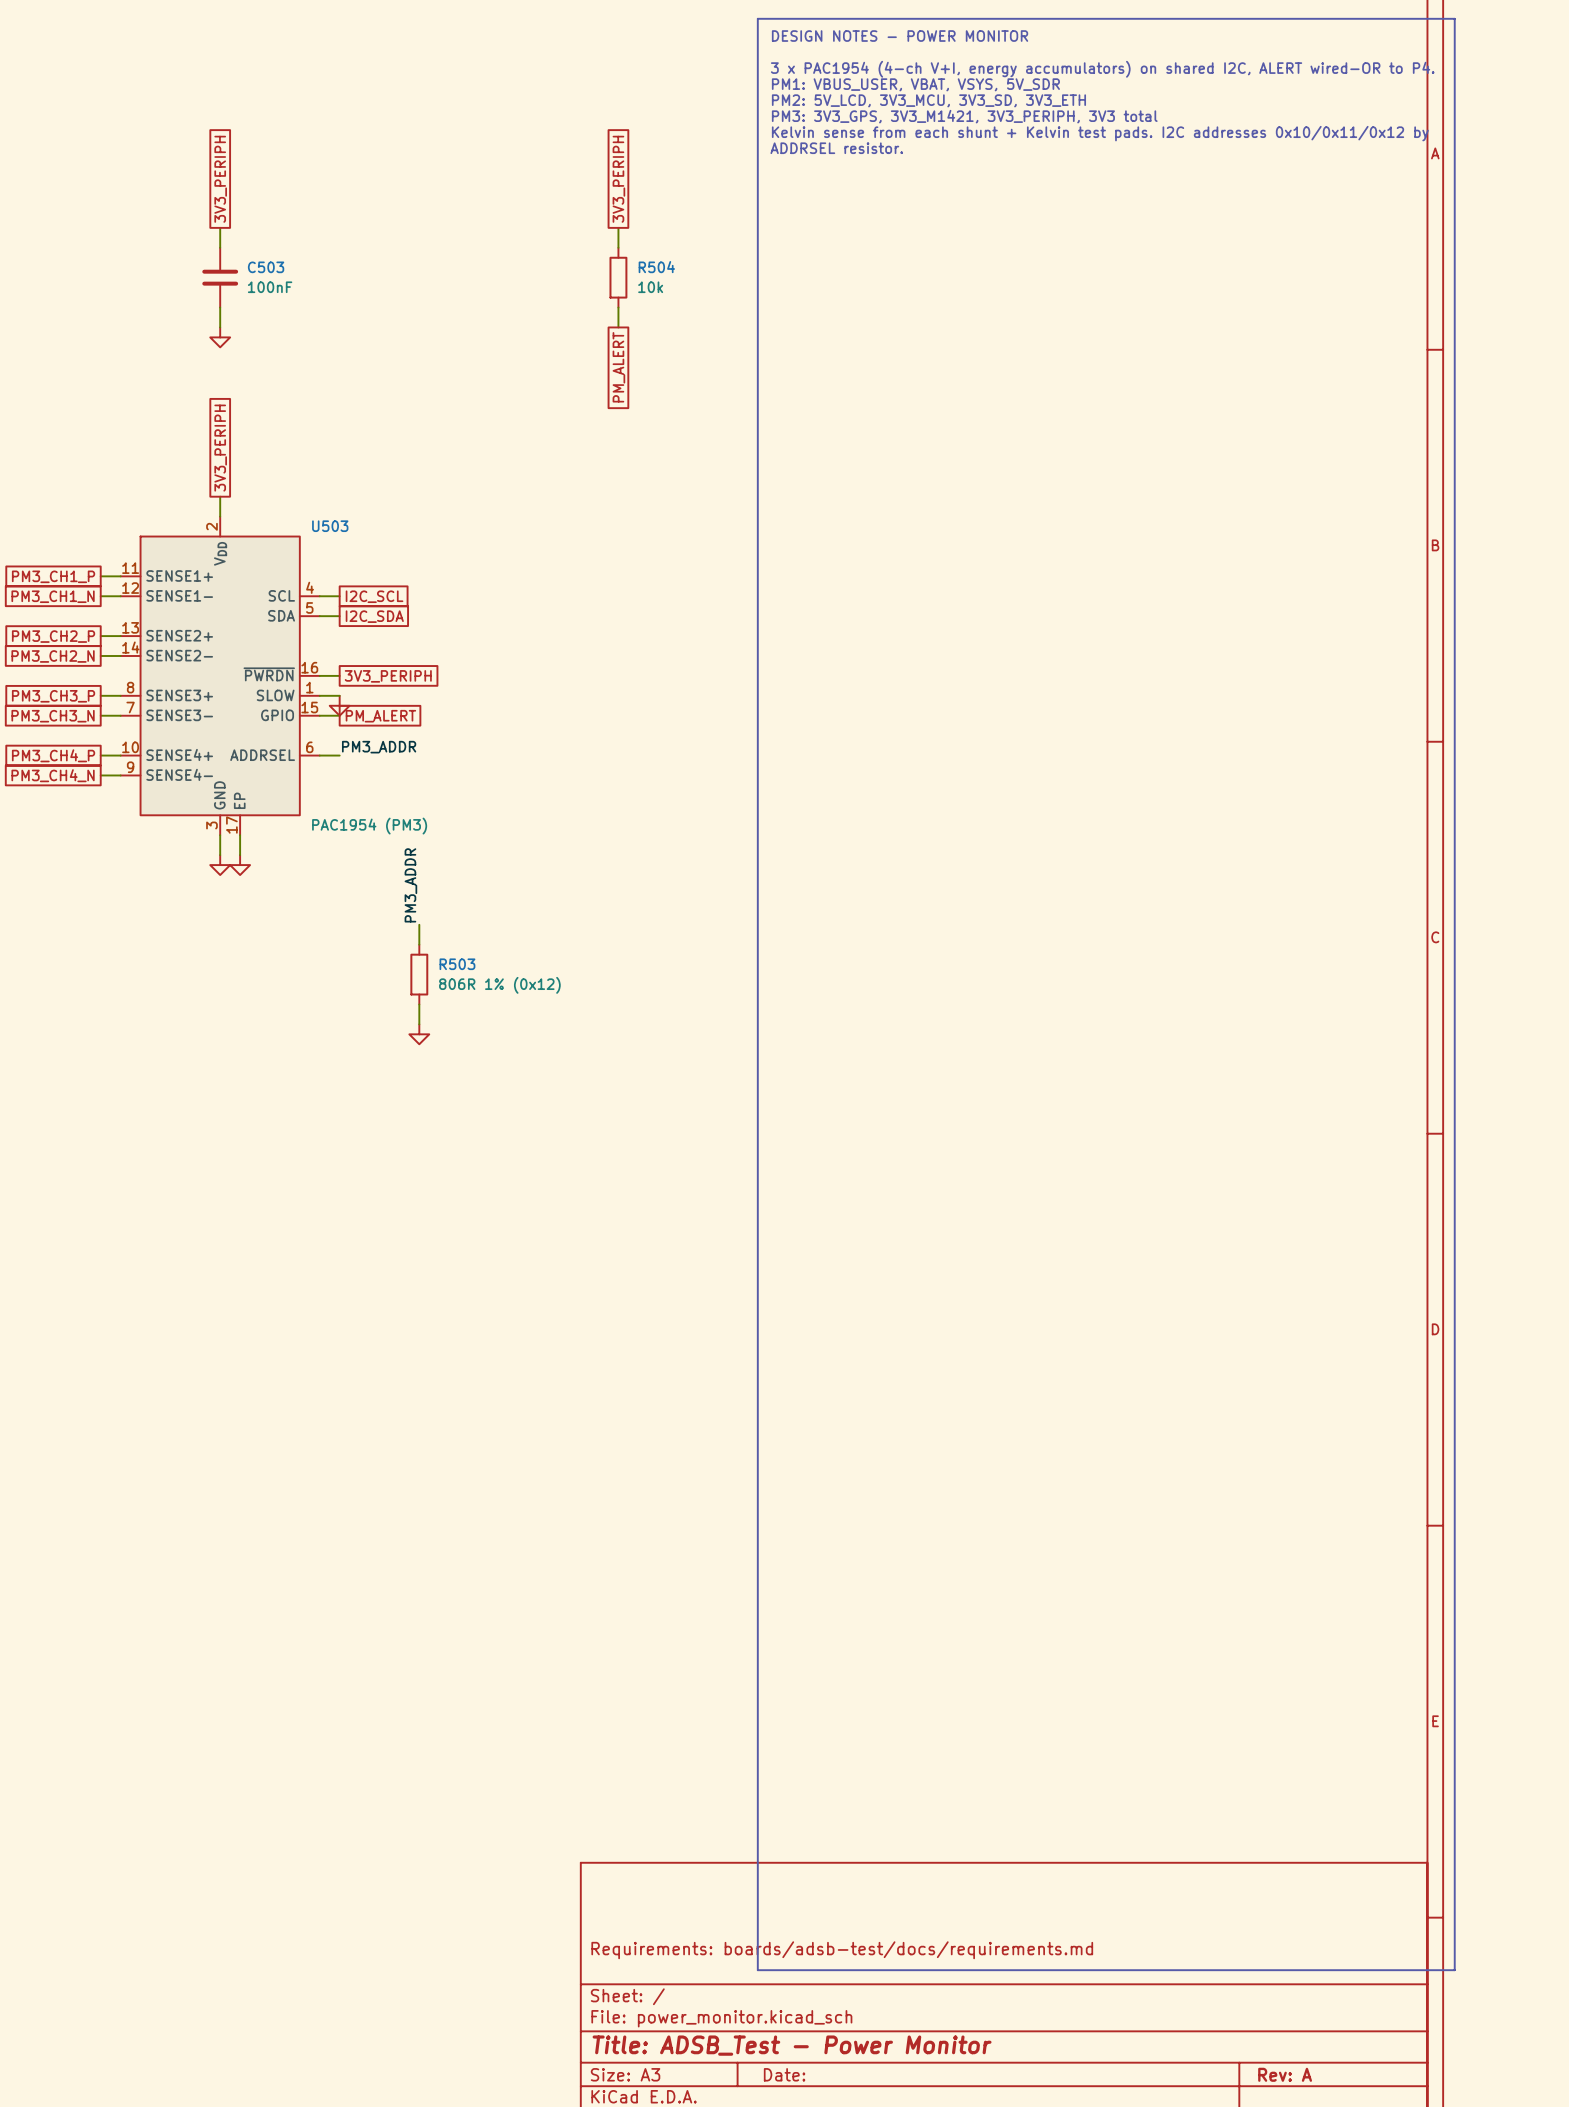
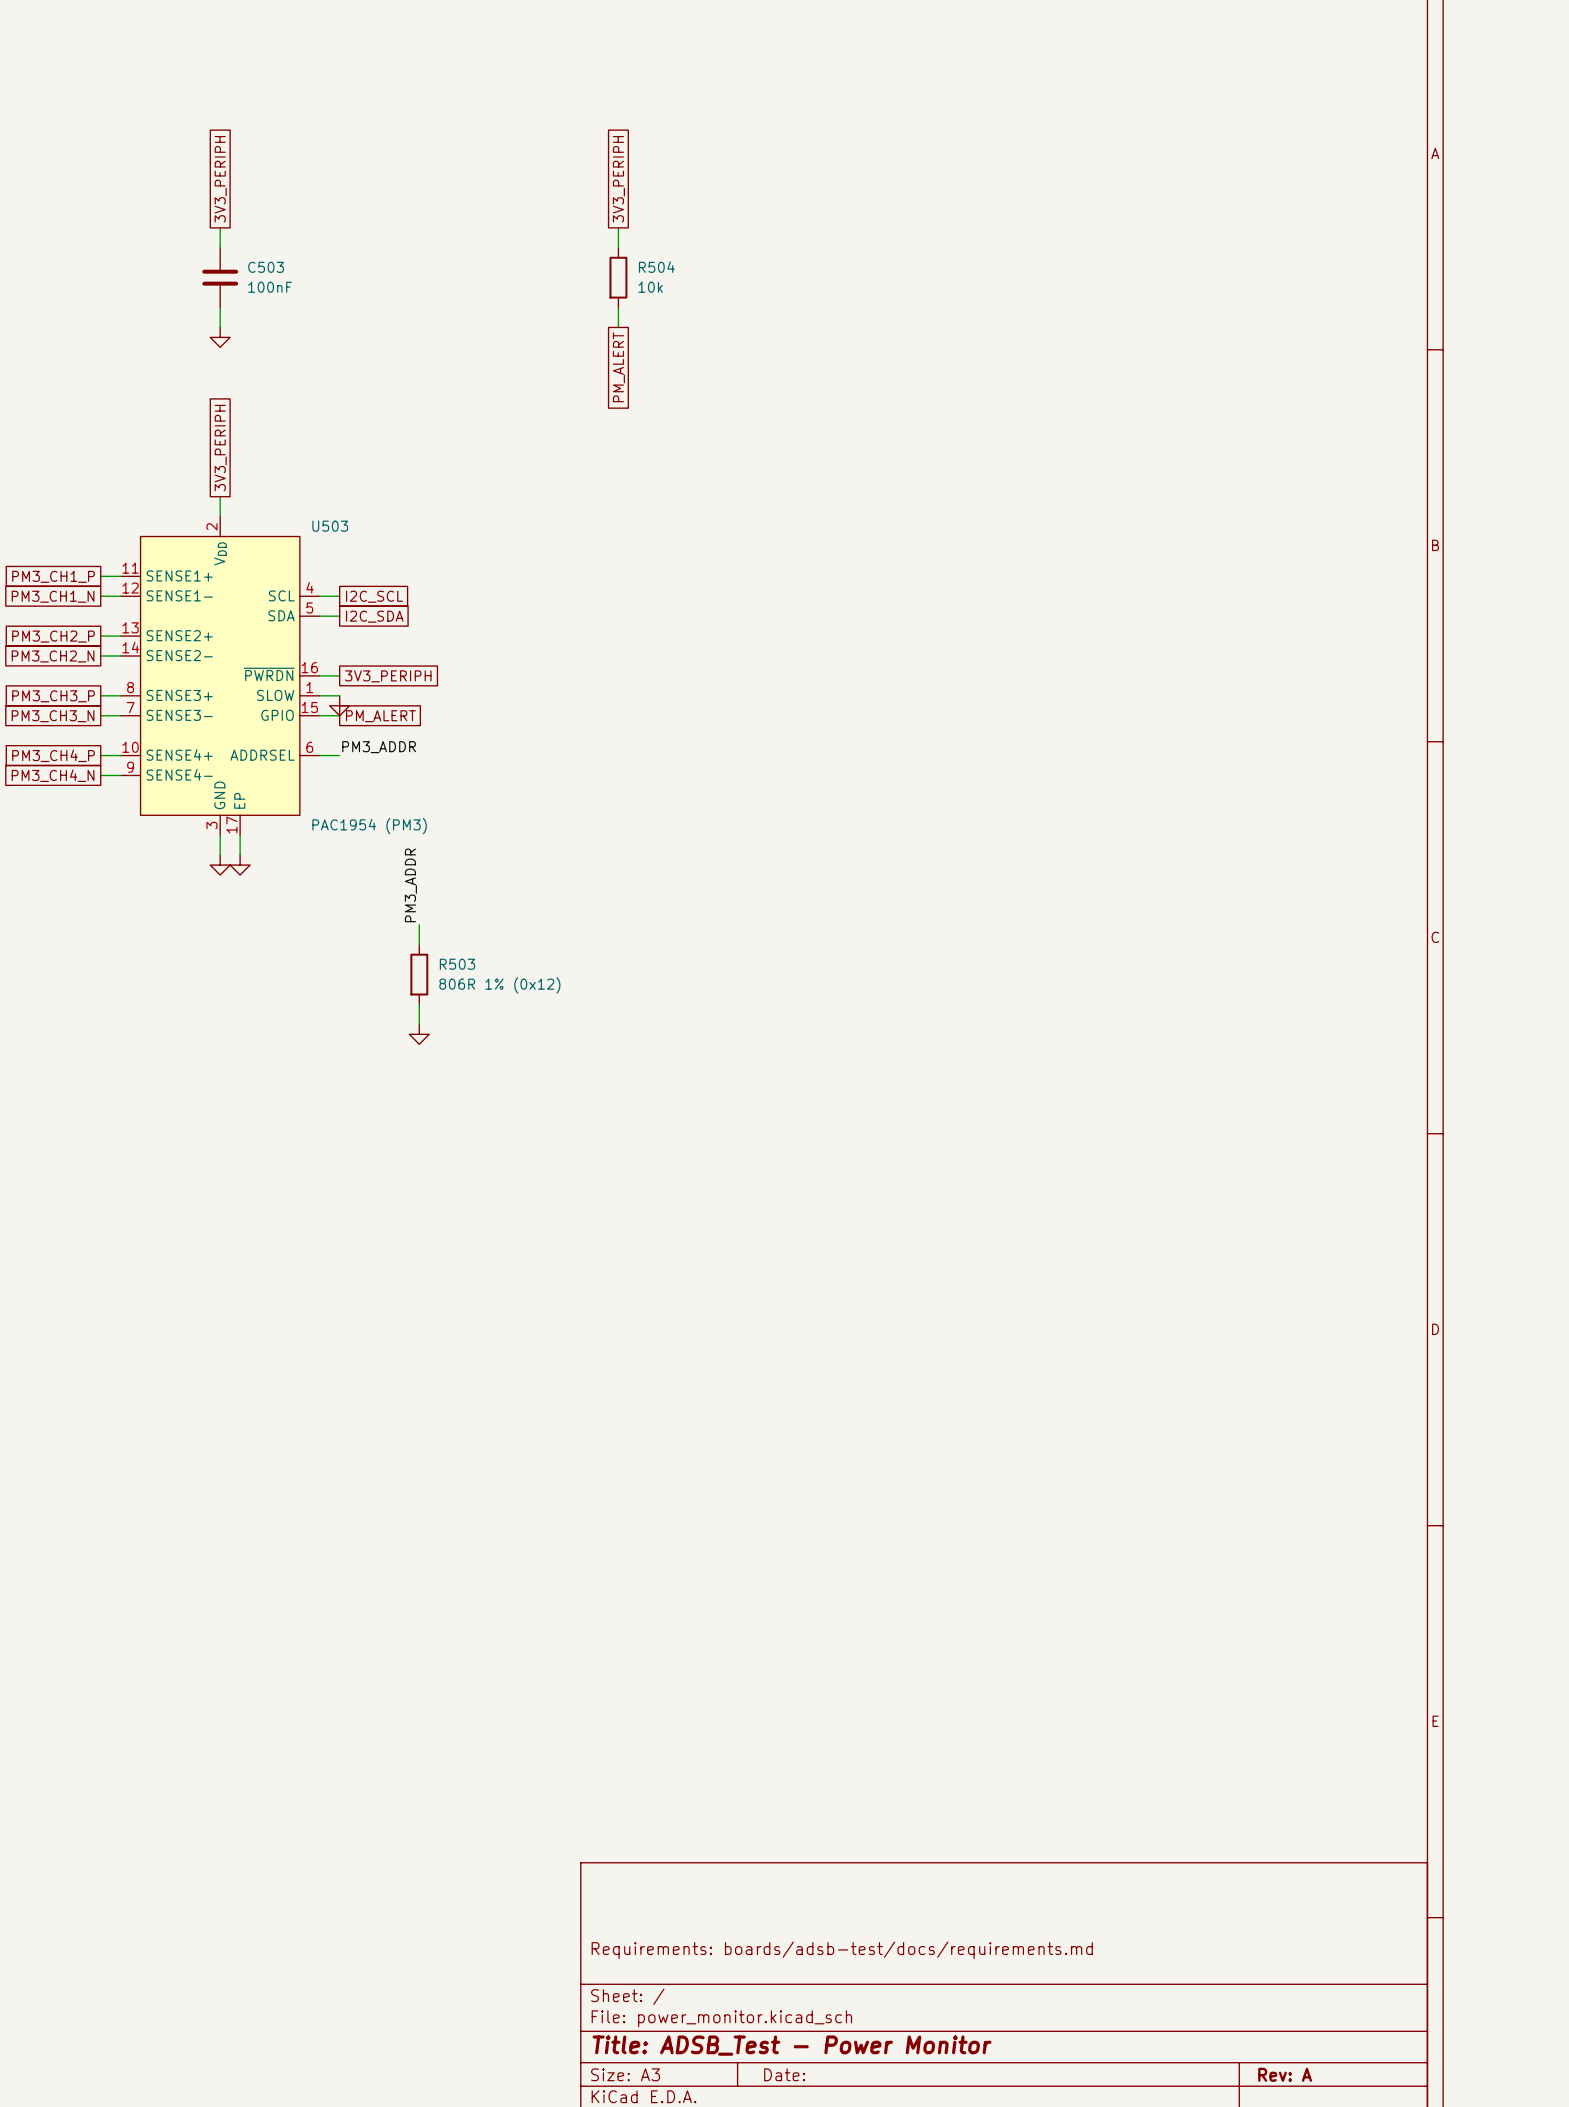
line: (757, 18) (1454, 18) (1454, 1970) (757, 1970) (757, 18) -> none
text: DESIGN NOTES - POWER MONITOR (900, 36) -> none
text: 3 x PAC1954 (4-ch V+I, energy accumulators) on shared I2C, ALERT wired-OR to P4. (1102, 69) -> none
text: PM1: VBUS_USER, VBAT, VSYS, 5V_SDR (915, 84) -> none
text: PM2: 5V_LCD, 3V3_MCU, 3V3_SD, 3V3_ETH (928, 100) -> none
text: PM3: 3V3_GPS, 3V3_M1421, 3V3_PERIPH, 3V3 total (964, 116) -> none
text: Kelvin sense from each shunt + Kelvin test pads. I2C addresses 0x10/0x11/0x12 by (1100, 133) -> none
text: ADDRSEL resistor. (836, 148) -> none

